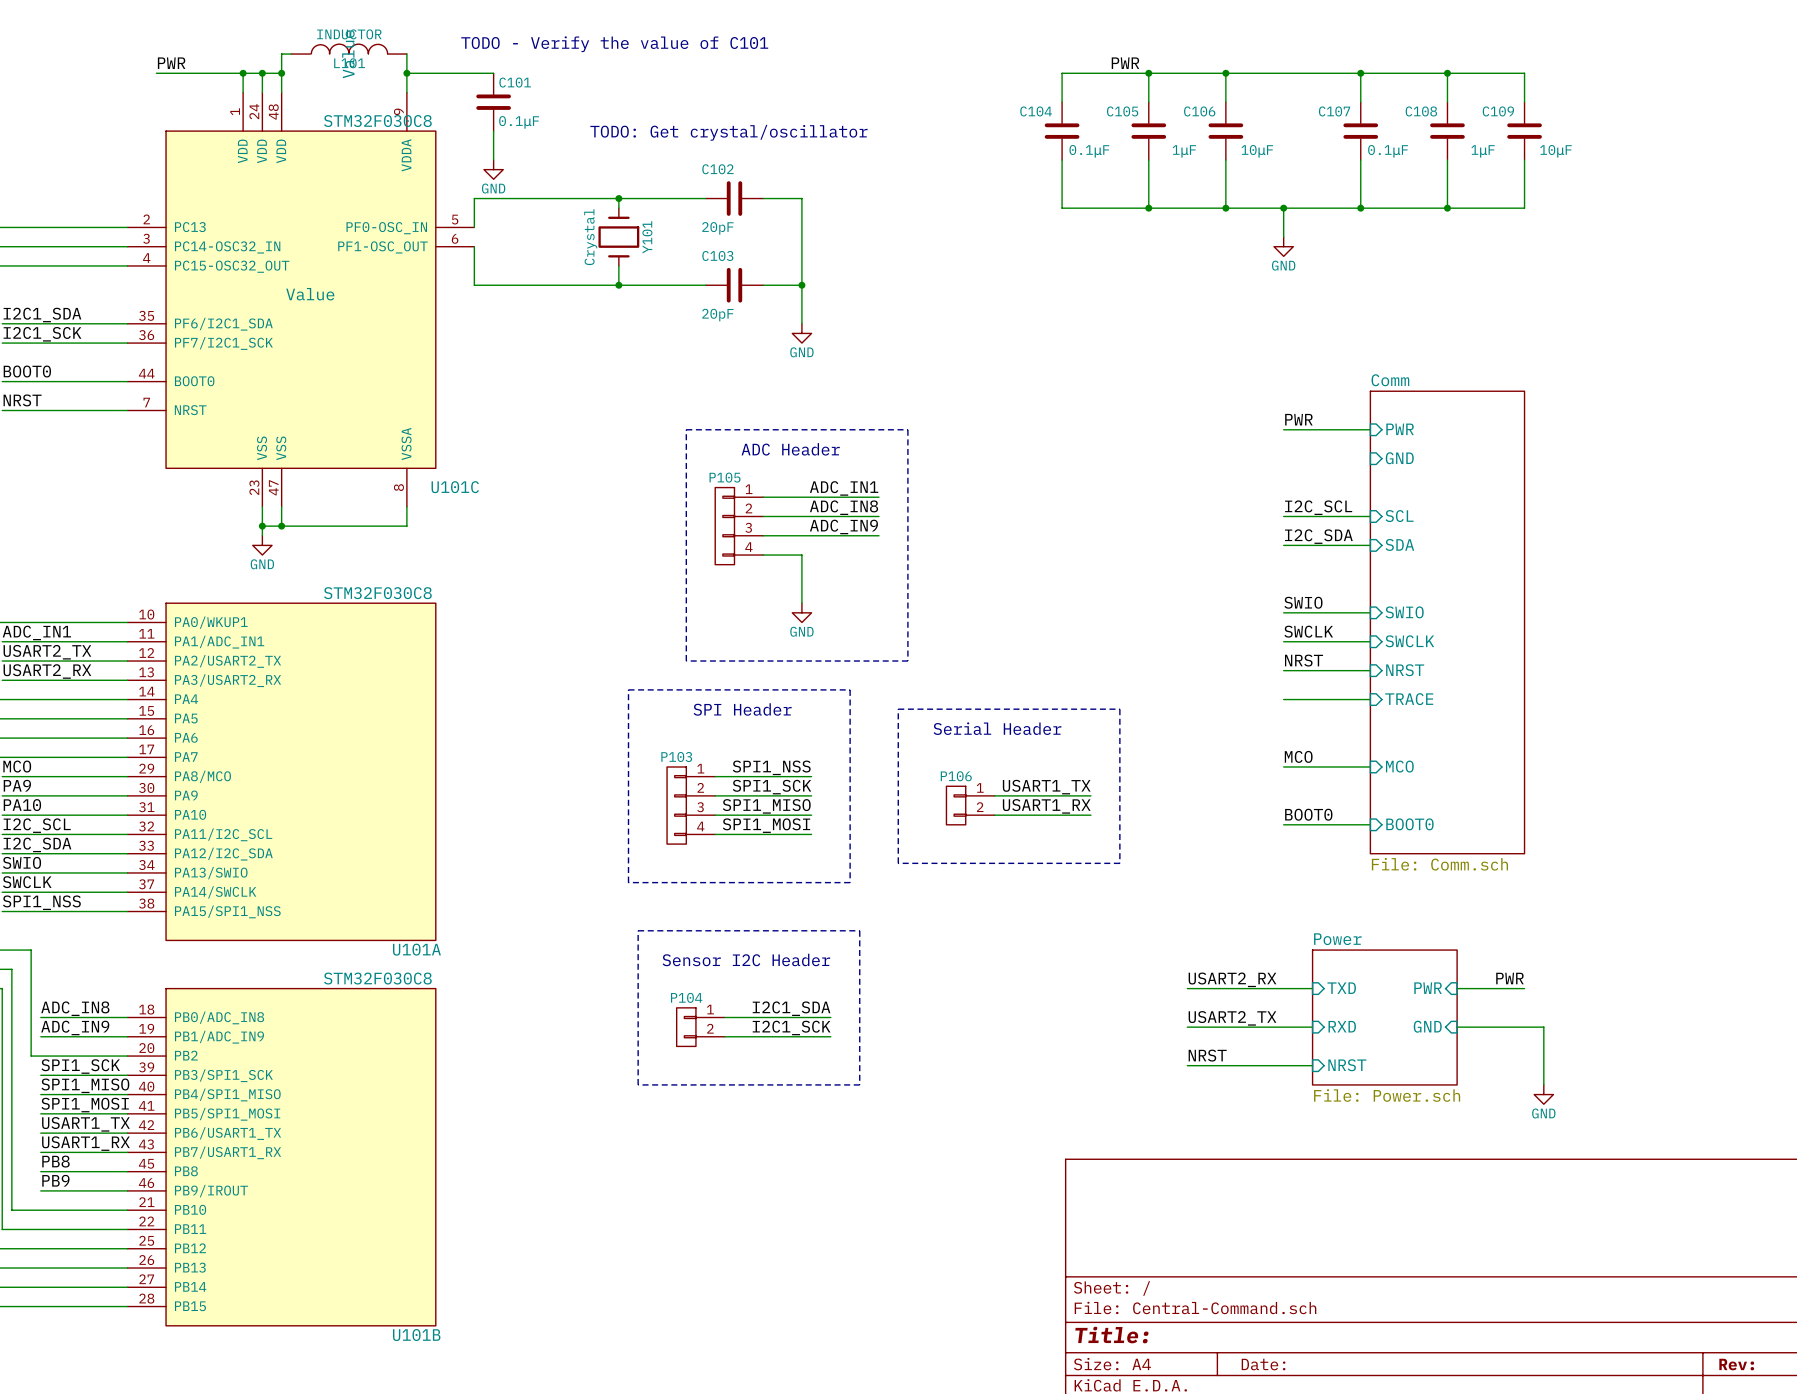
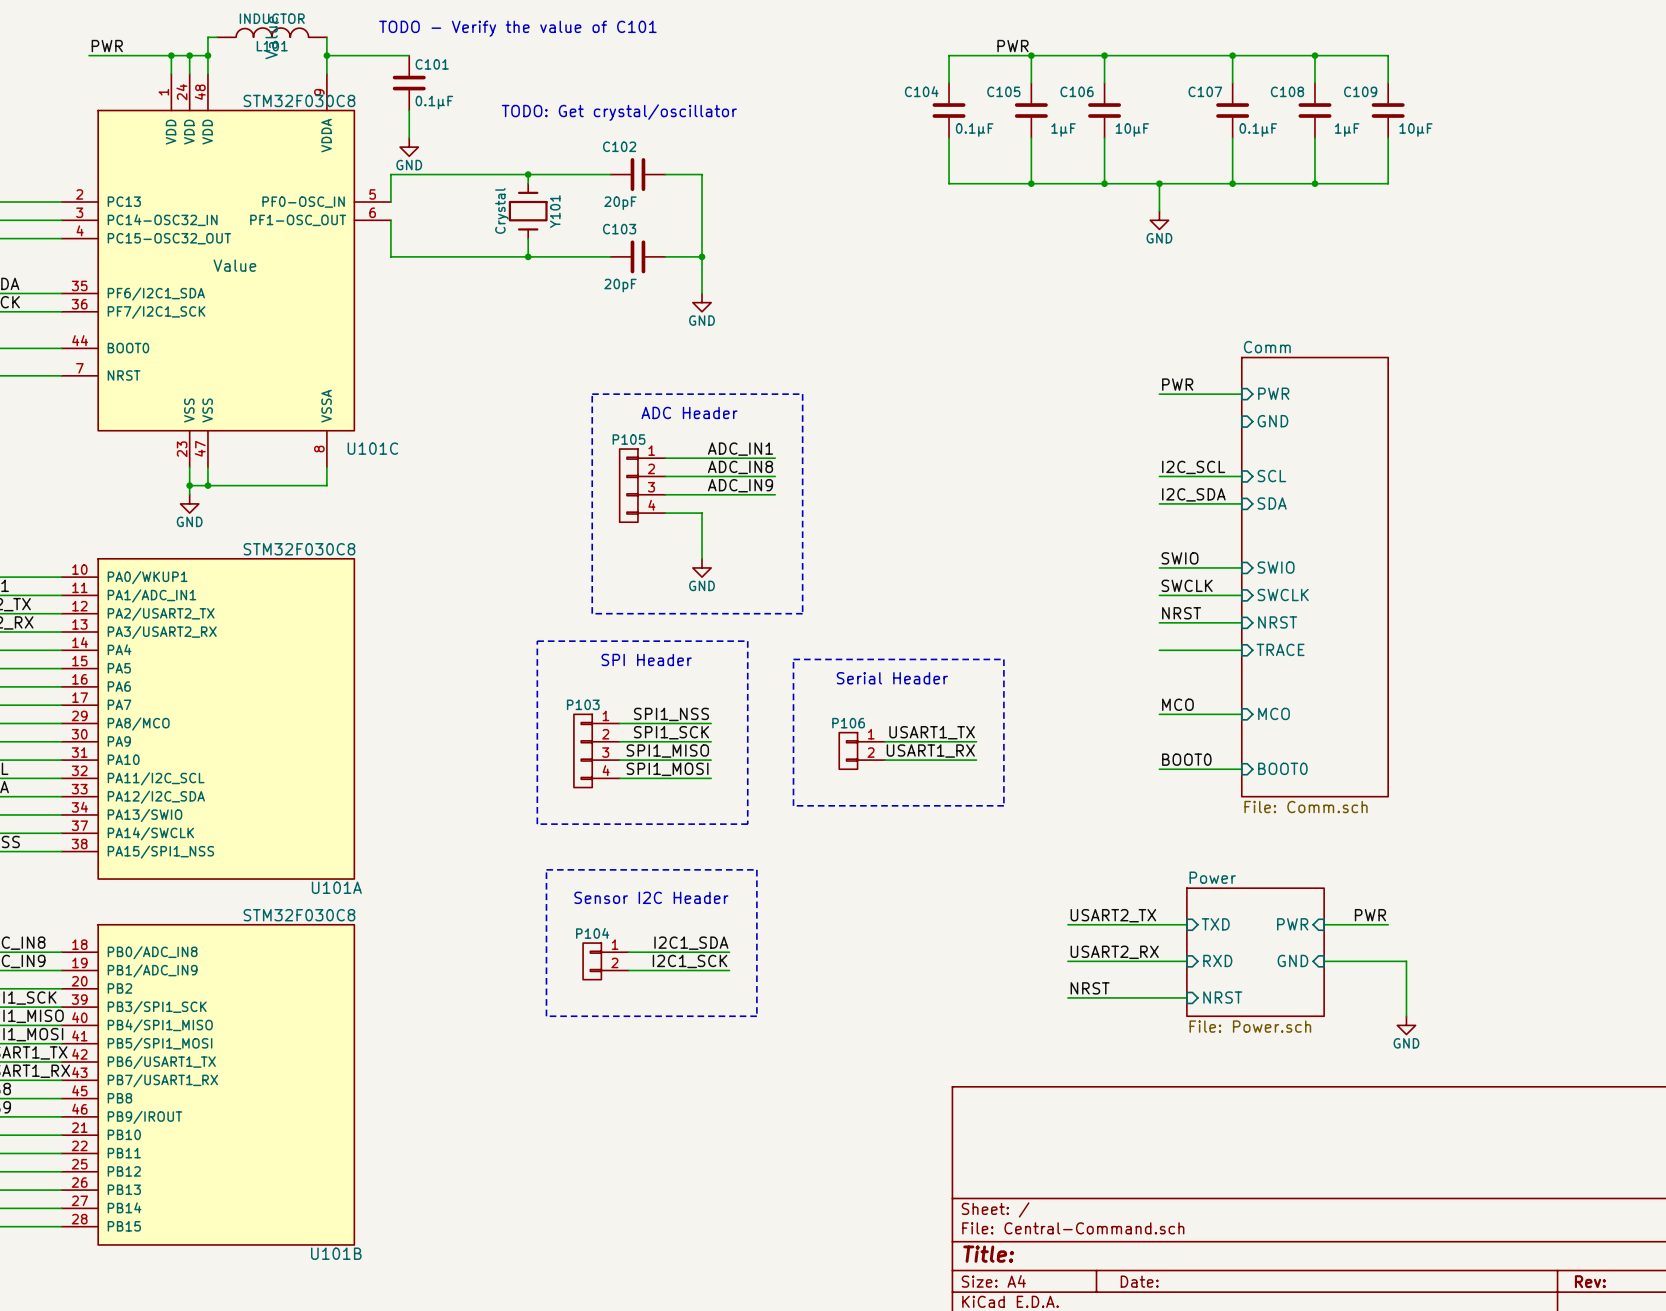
label: USART2_RX (1232, 979) -> USART2_TX (1113, 915)
label: USART2_TX (1232, 1018) -> USART2_RX (1114, 952)

